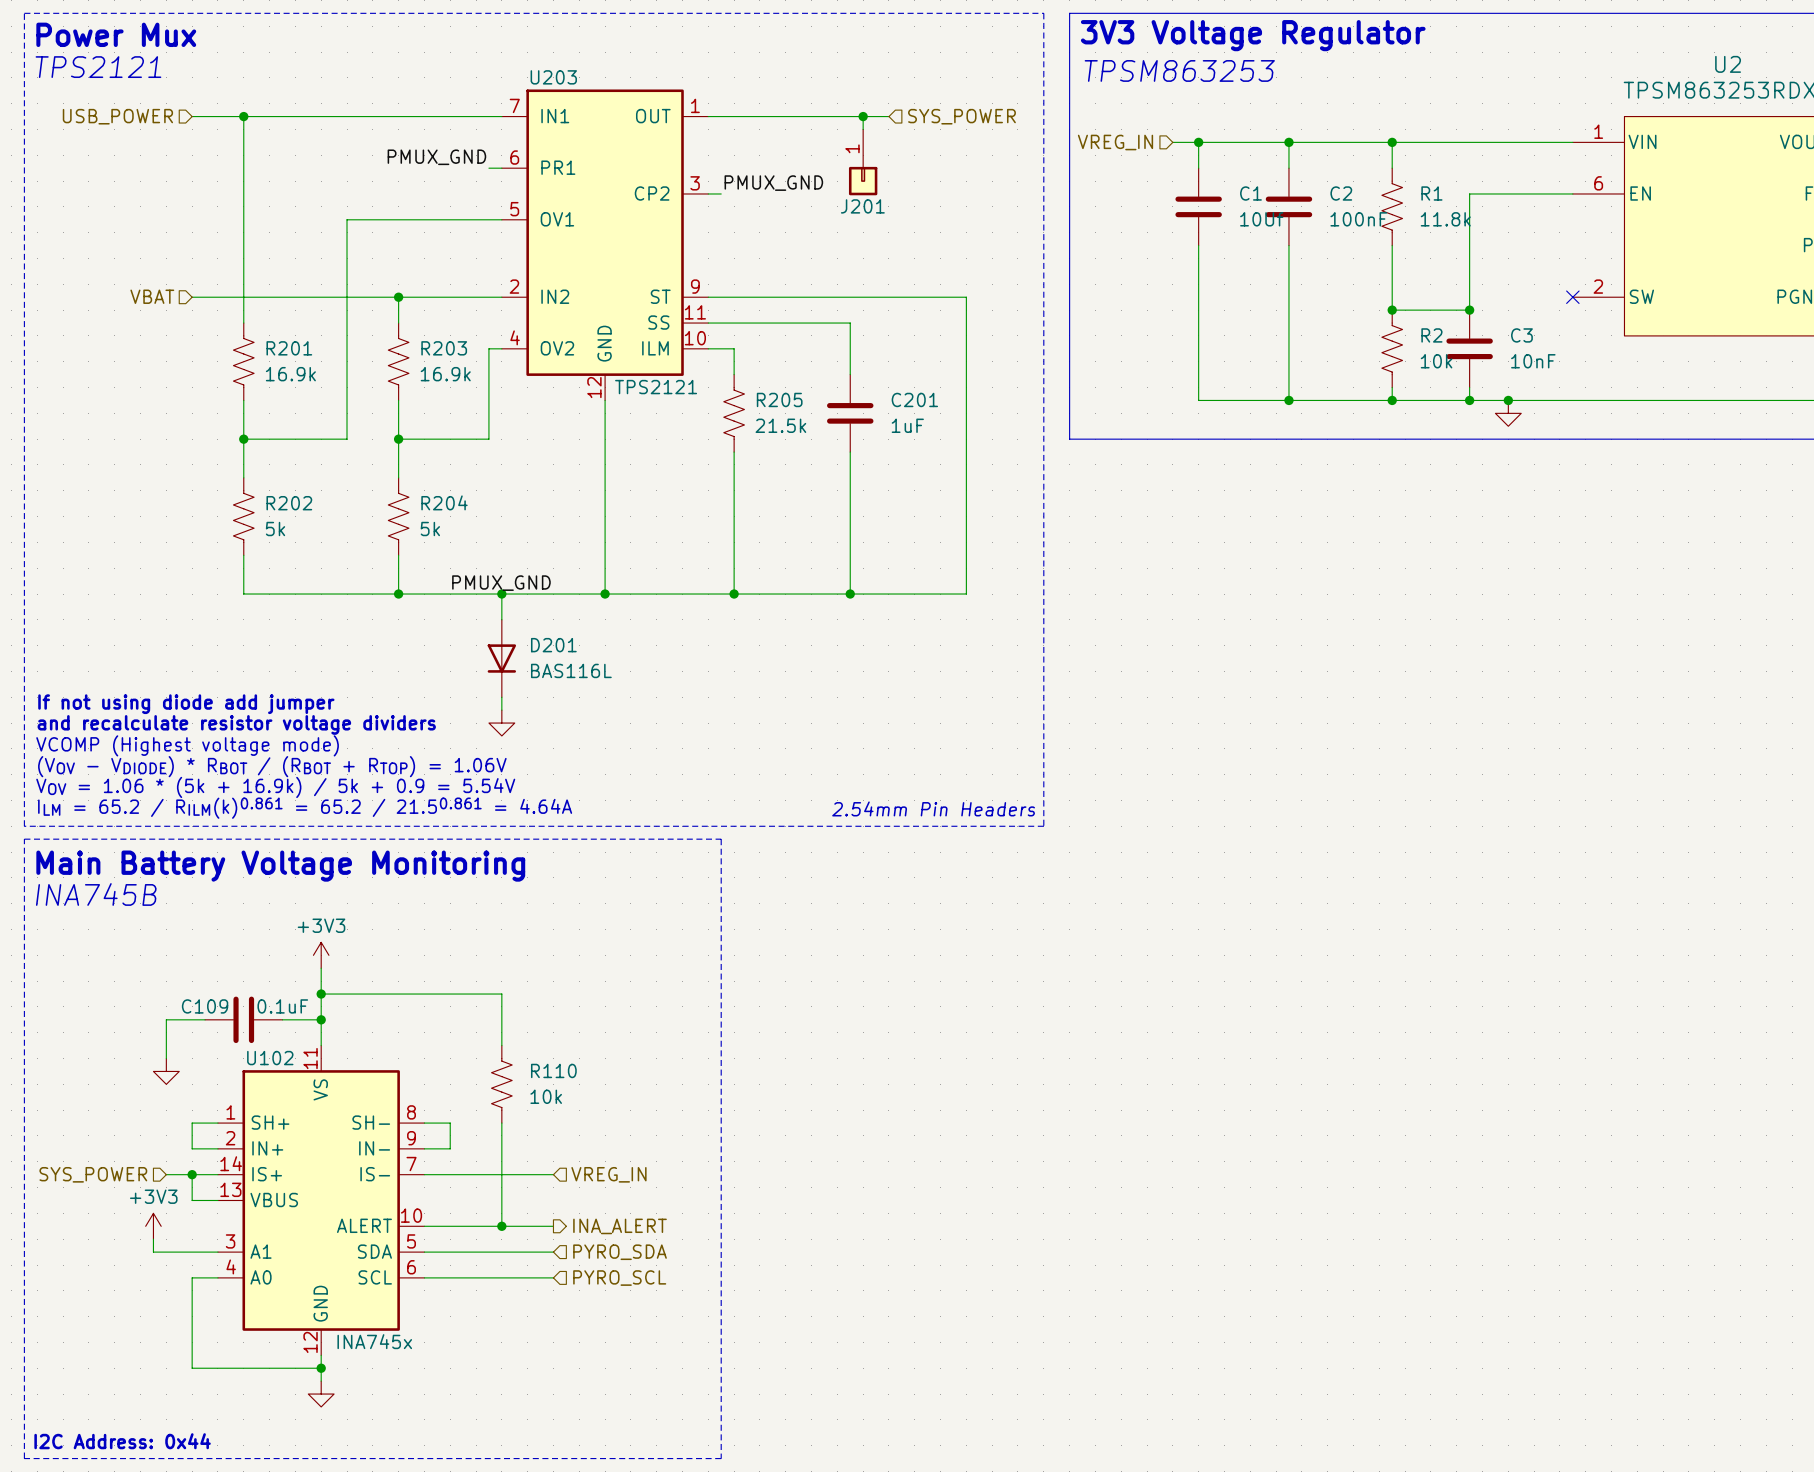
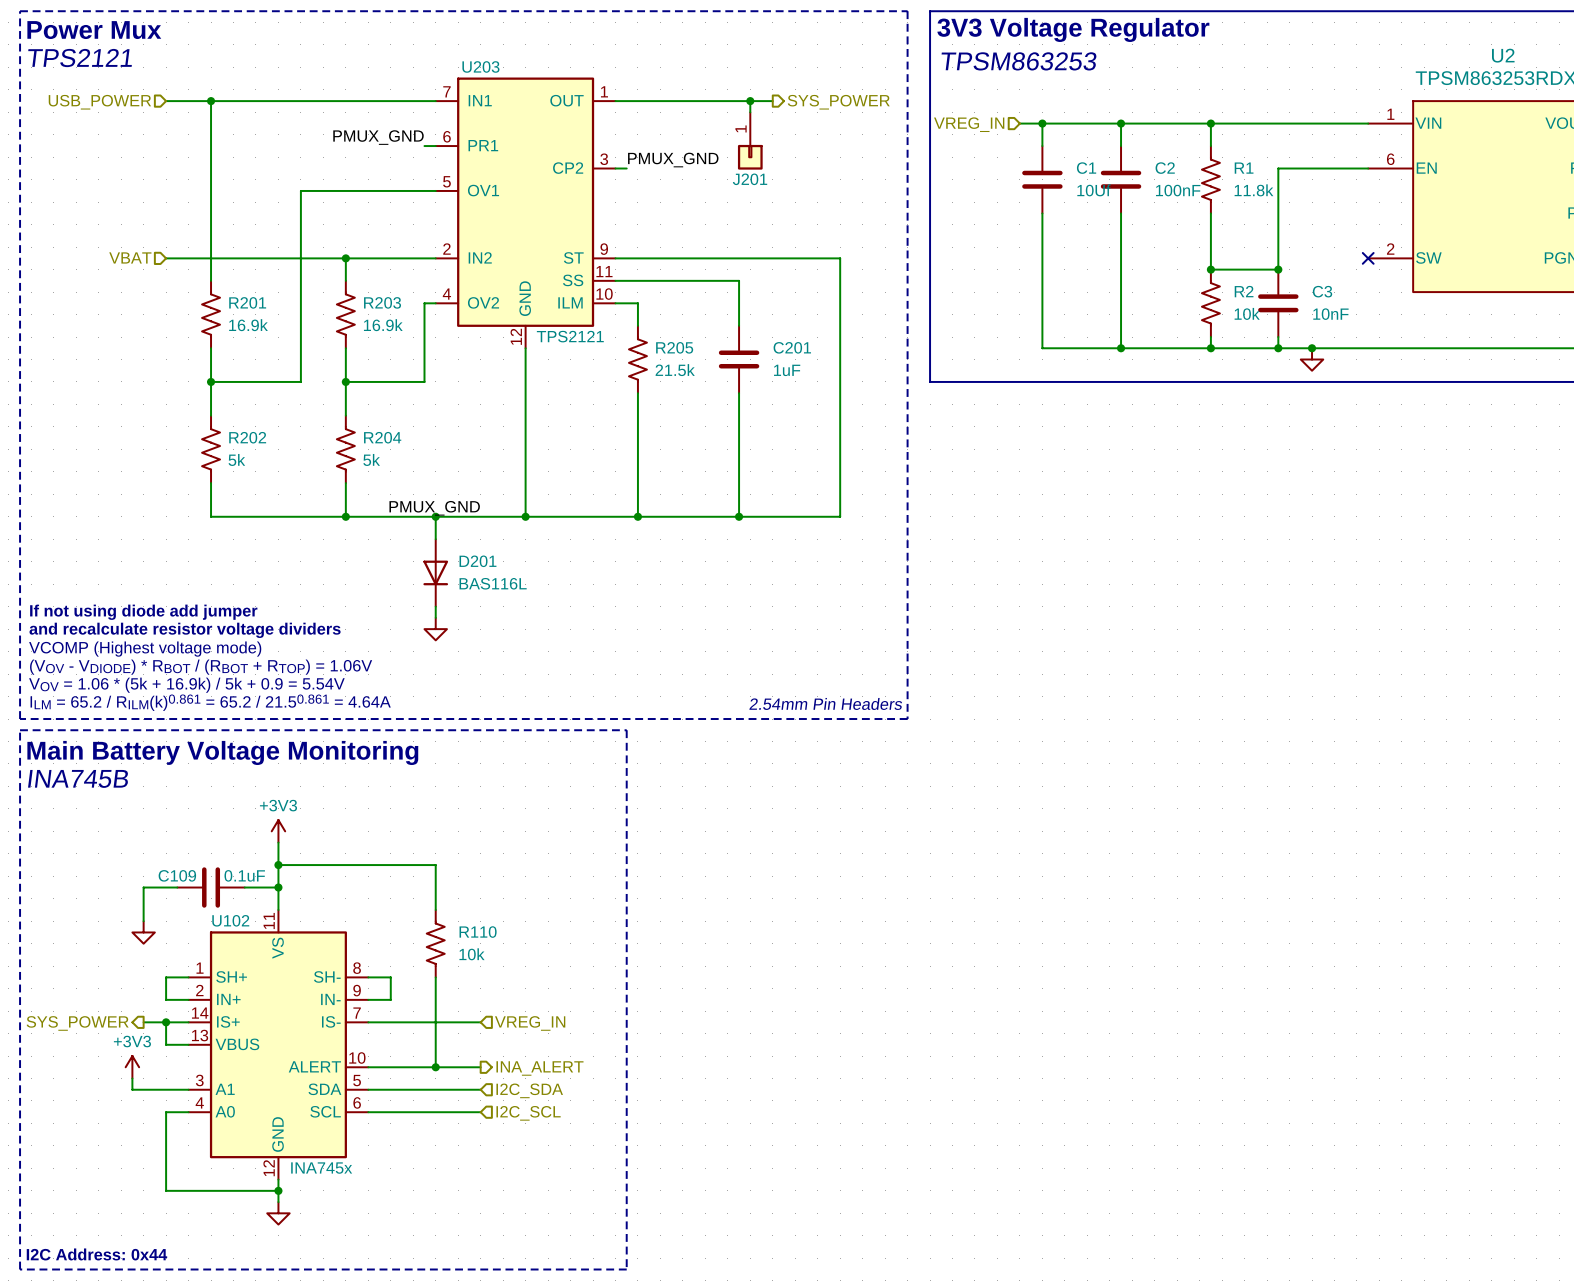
hierarchical label shape: input (961, 116) -> output (838, 102)
hierarchical label shape: input (93, 1174) -> output (77, 1023)
hierarchical label: PYRO_SDA (620, 1252) -> I2C_SDA (529, 1090)
hierarchical label: PYRO_SCL (619, 1278) -> I2C_SCL (528, 1113)

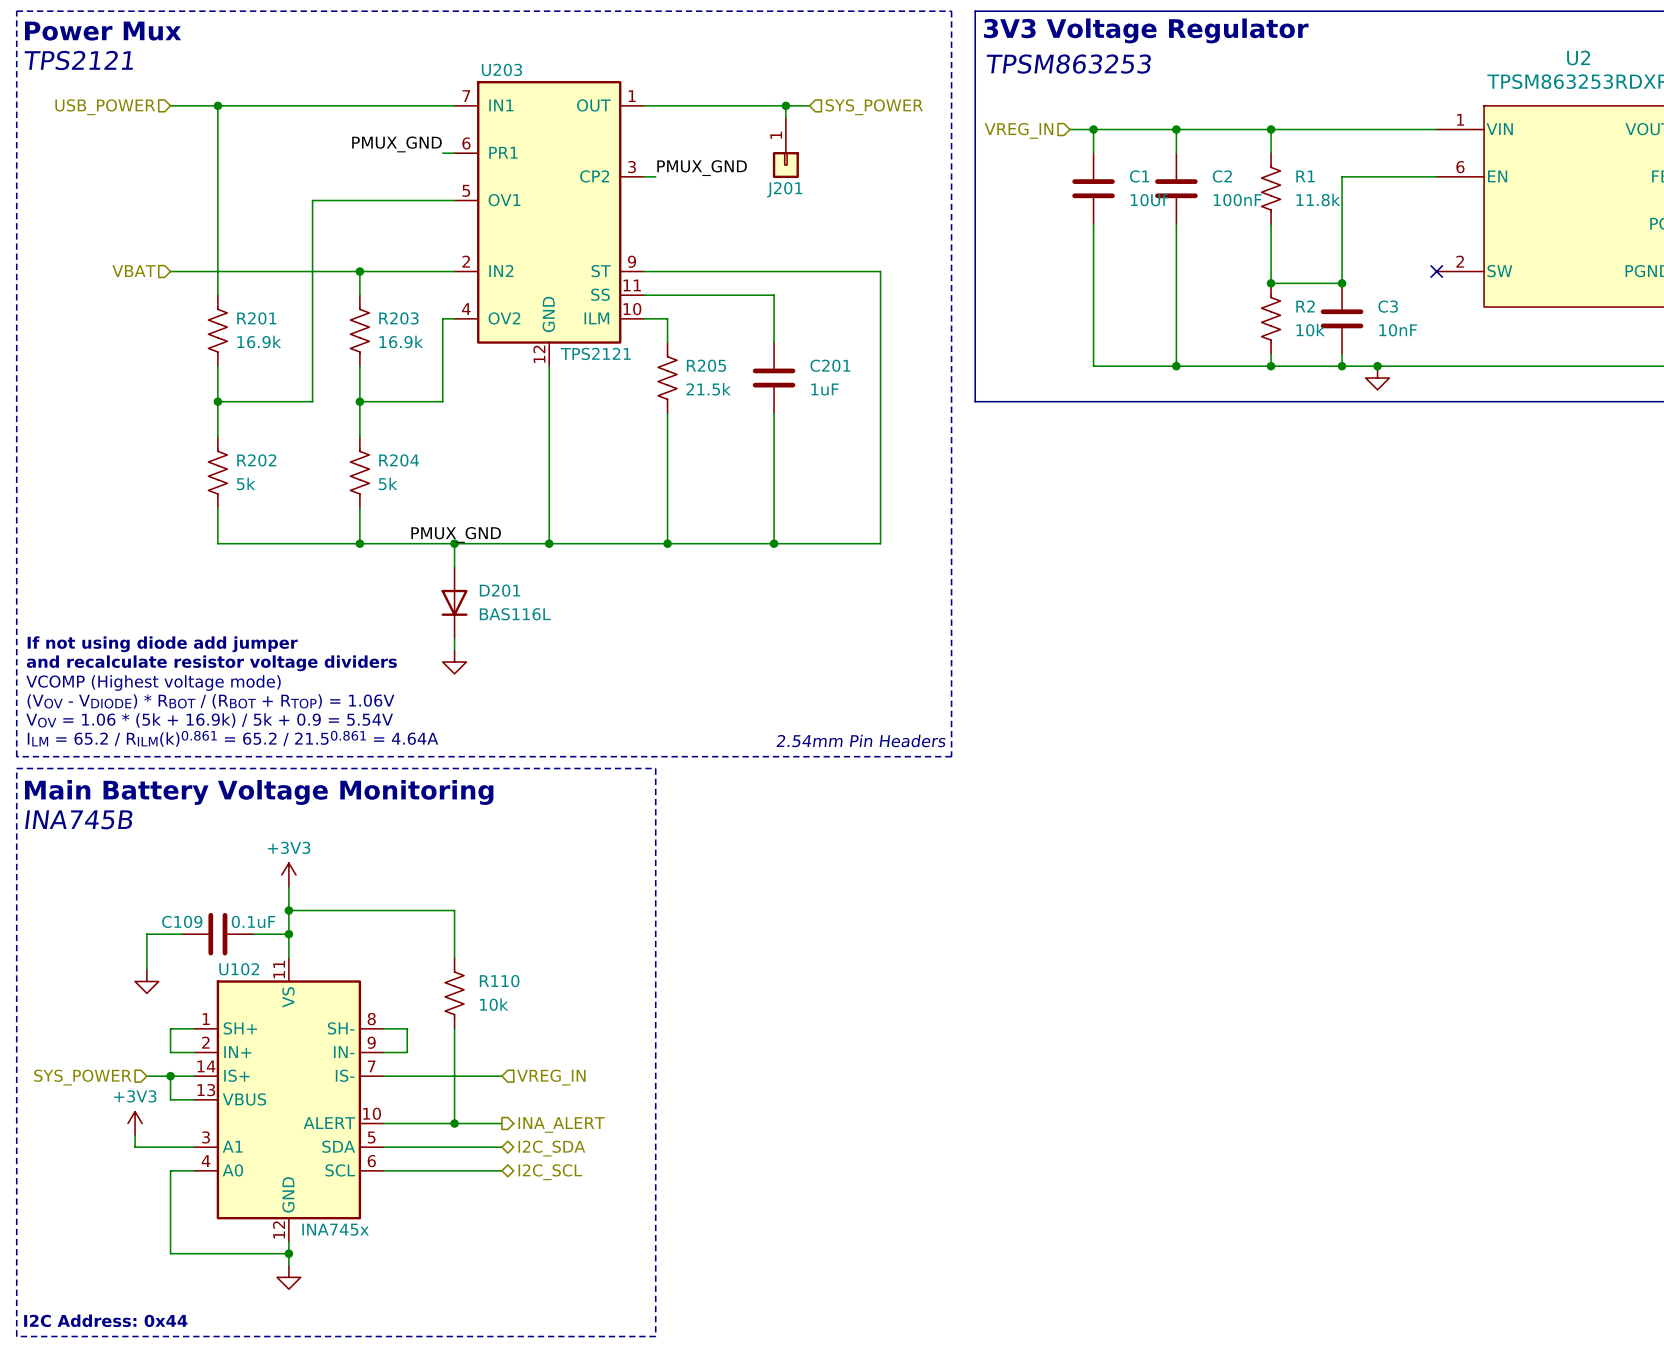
hierarchical label shape: output (838, 102) -> input (874, 107)
hierarchical label shape: output (77, 1023) -> input (82, 1077)
hierarchical label shape: input (529, 1090) -> bidirectional (551, 1148)
hierarchical label shape: input (528, 1113) -> bidirectional (550, 1172)

